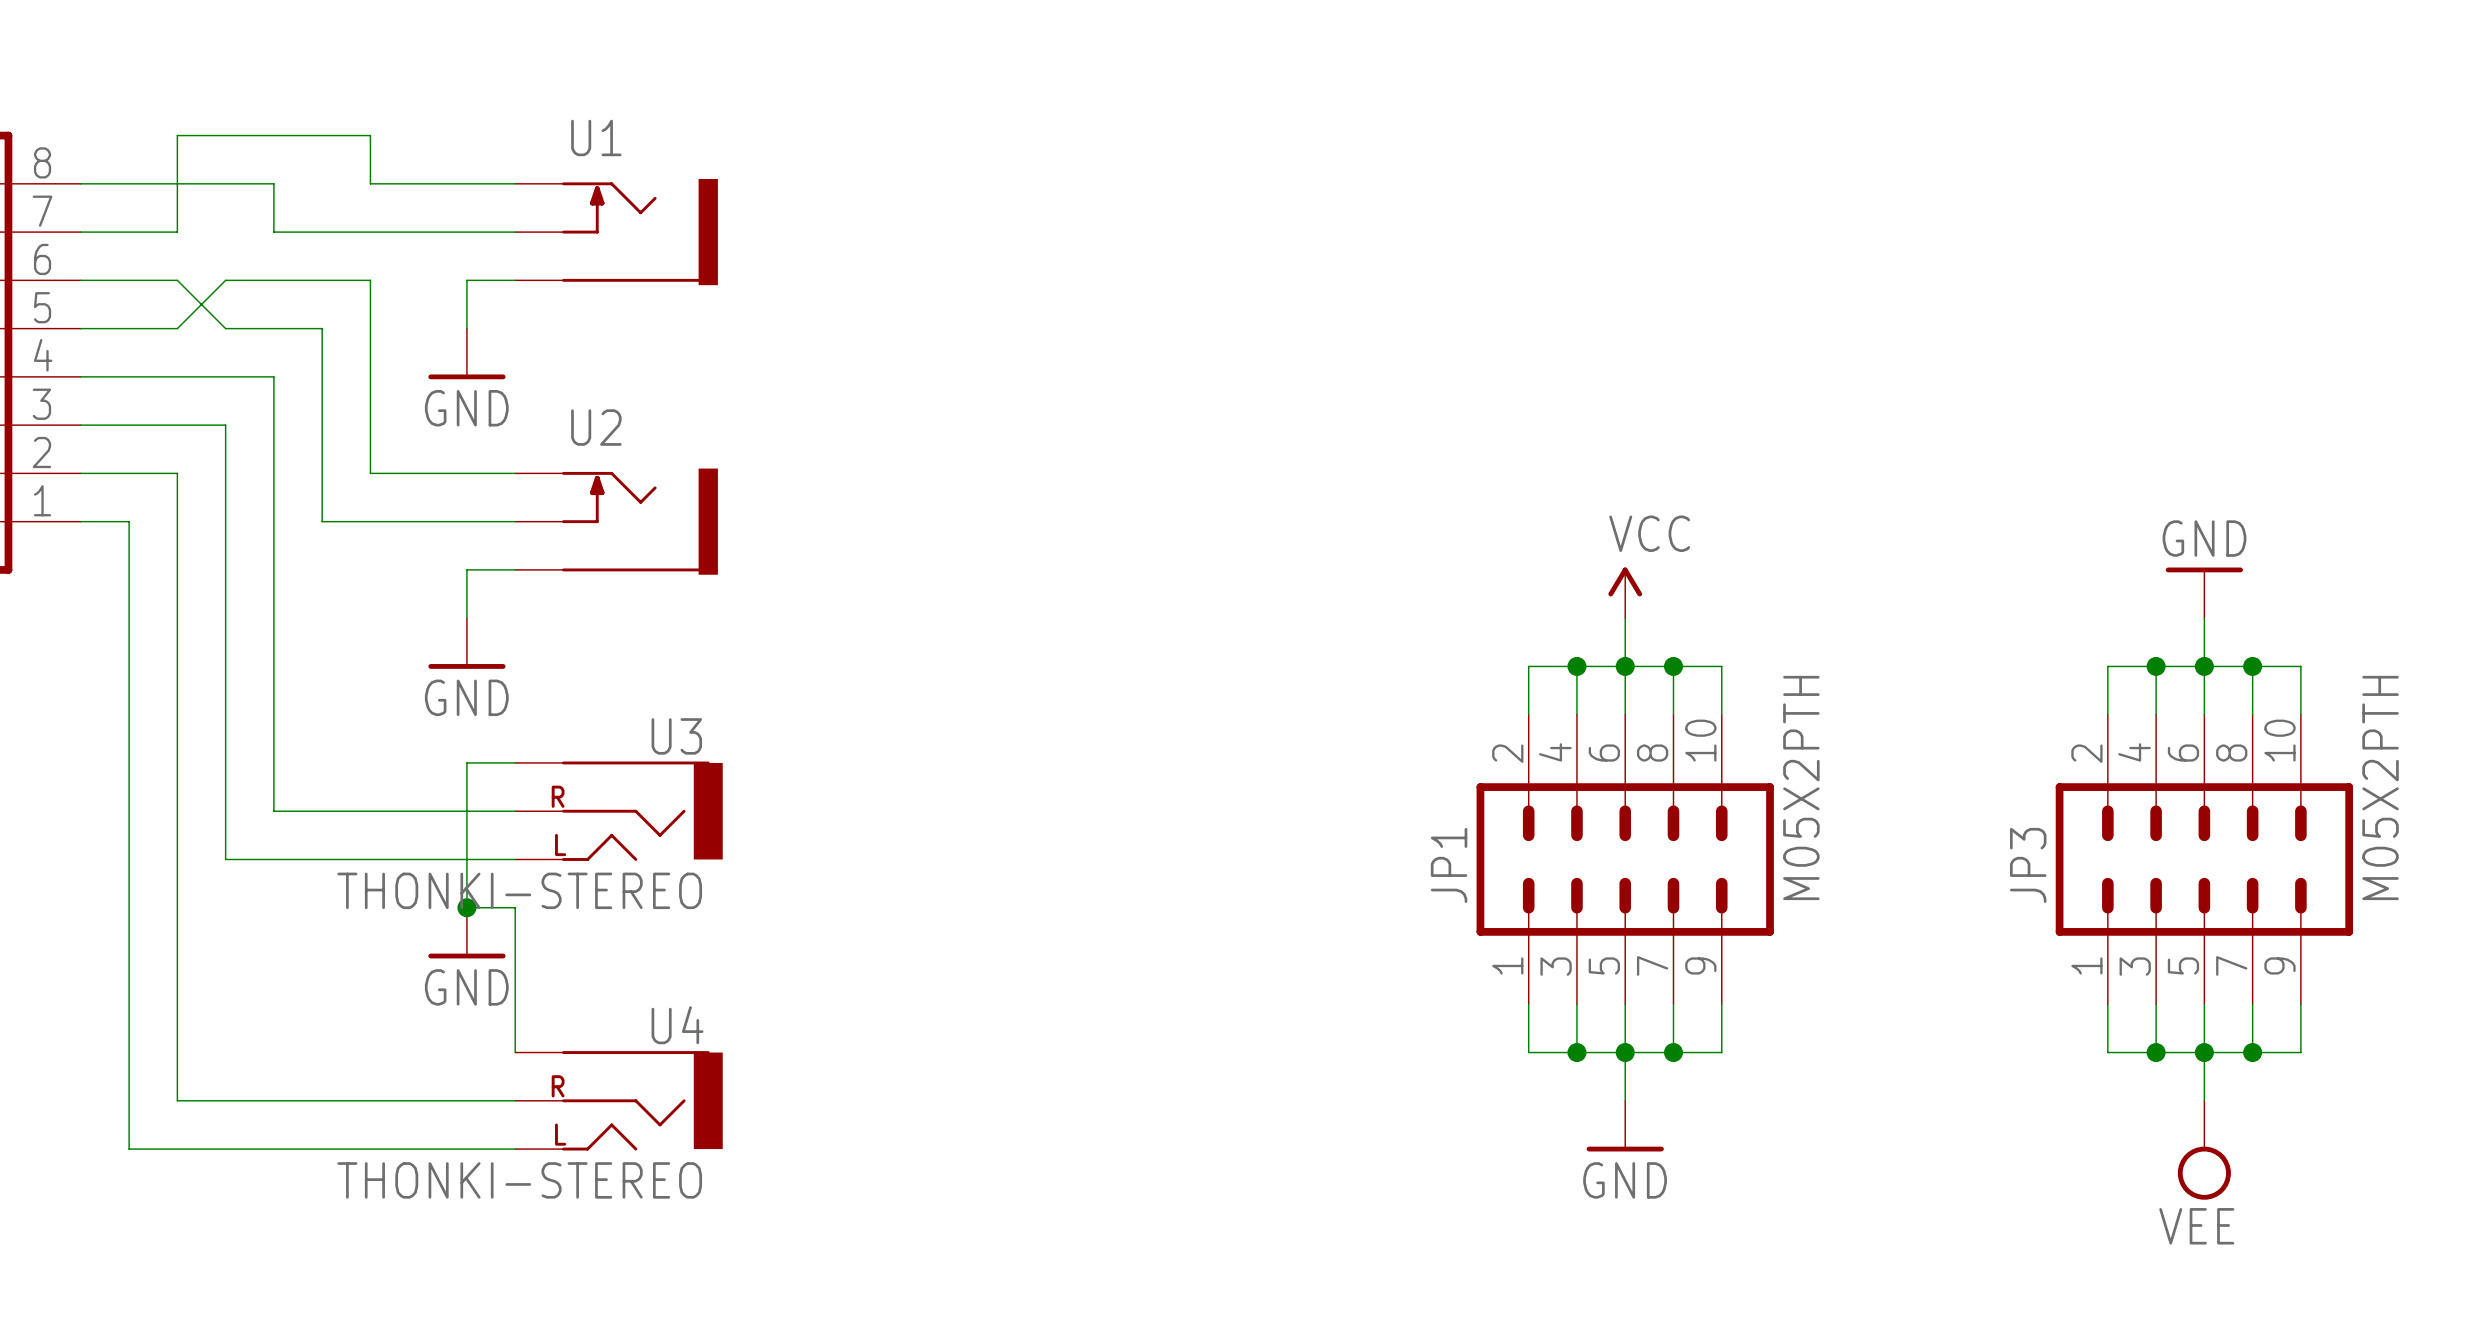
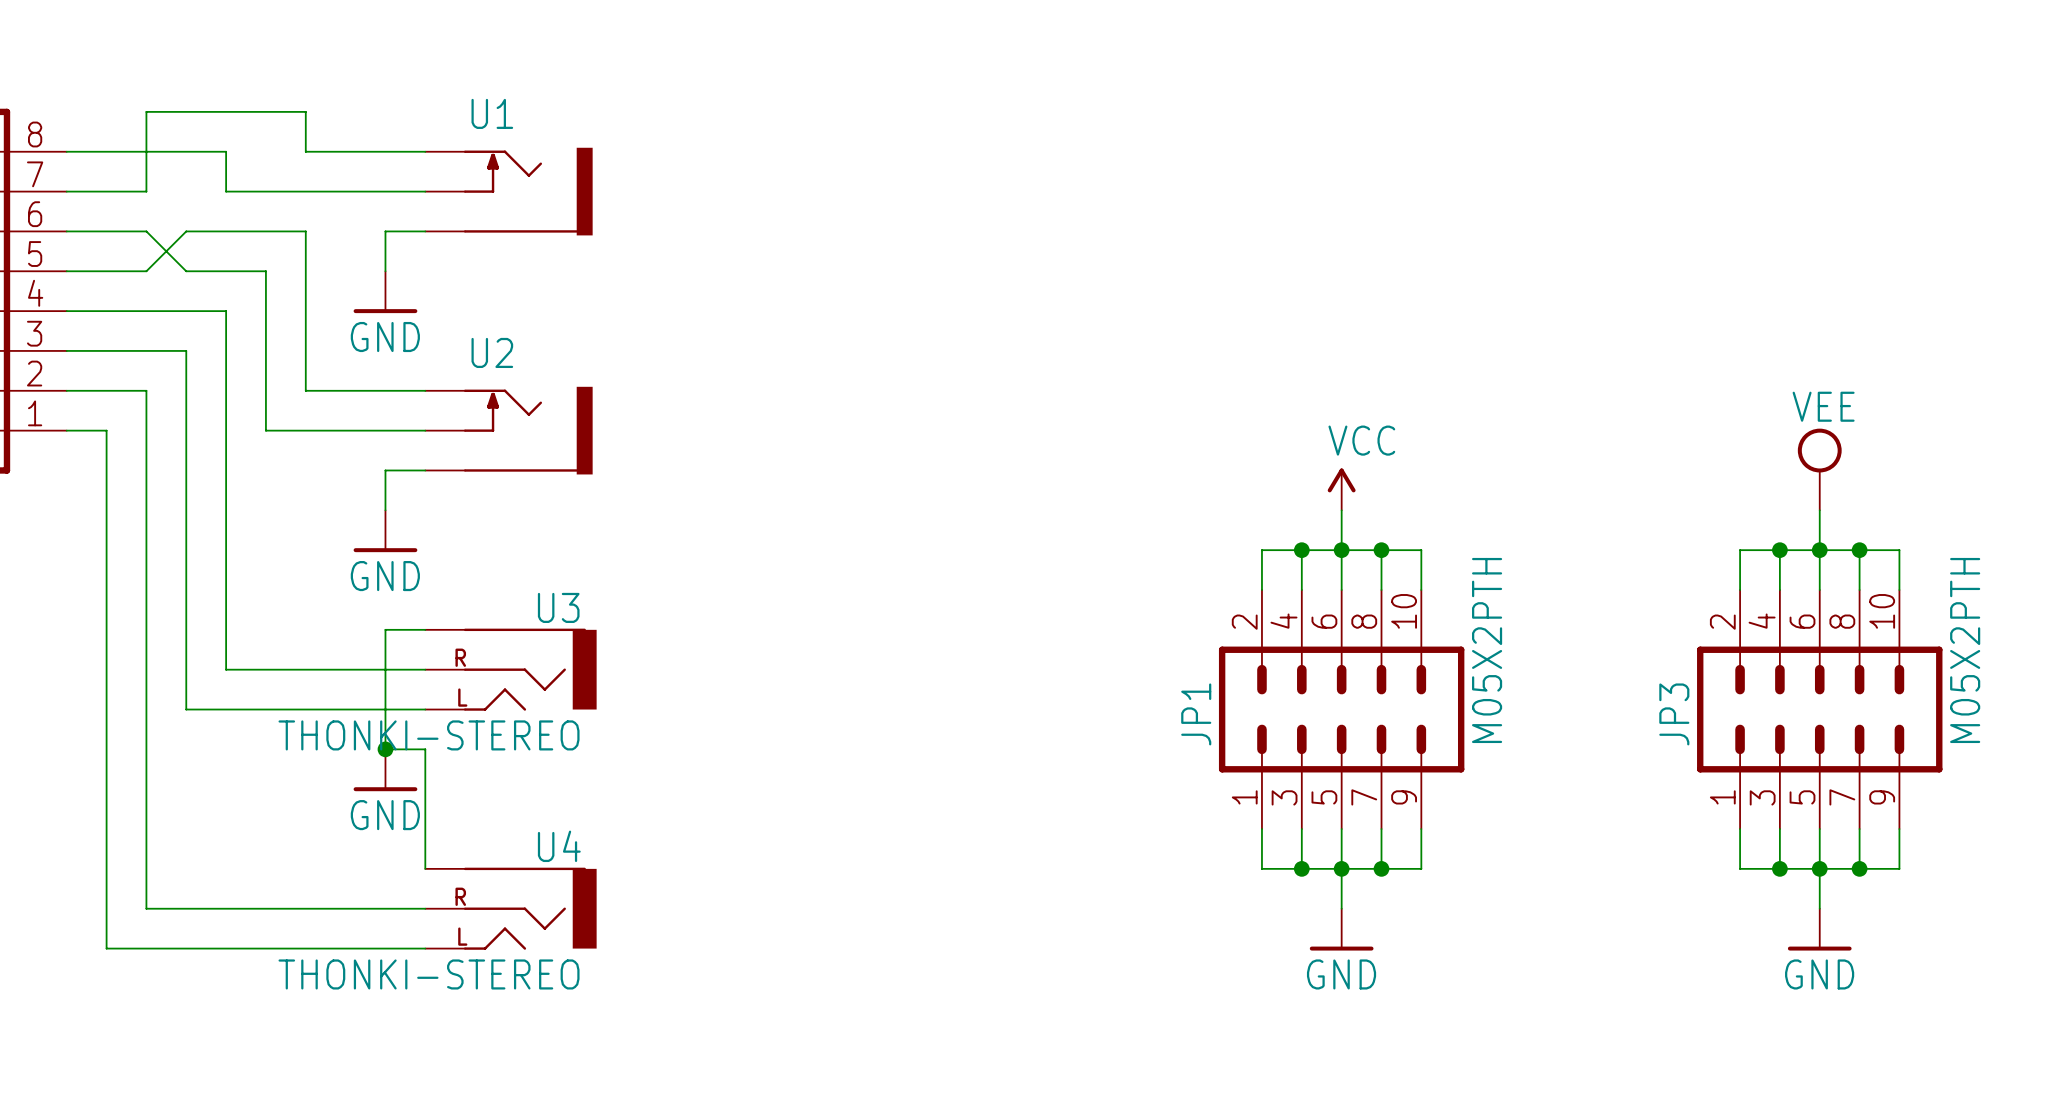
power symbol: none -> VEE (1819, 469)
power symbol: GND (2204, 592) -> none
power symbol: none -> GND (1819, 929)
power symbol: VEE (2204, 1150) -> none

